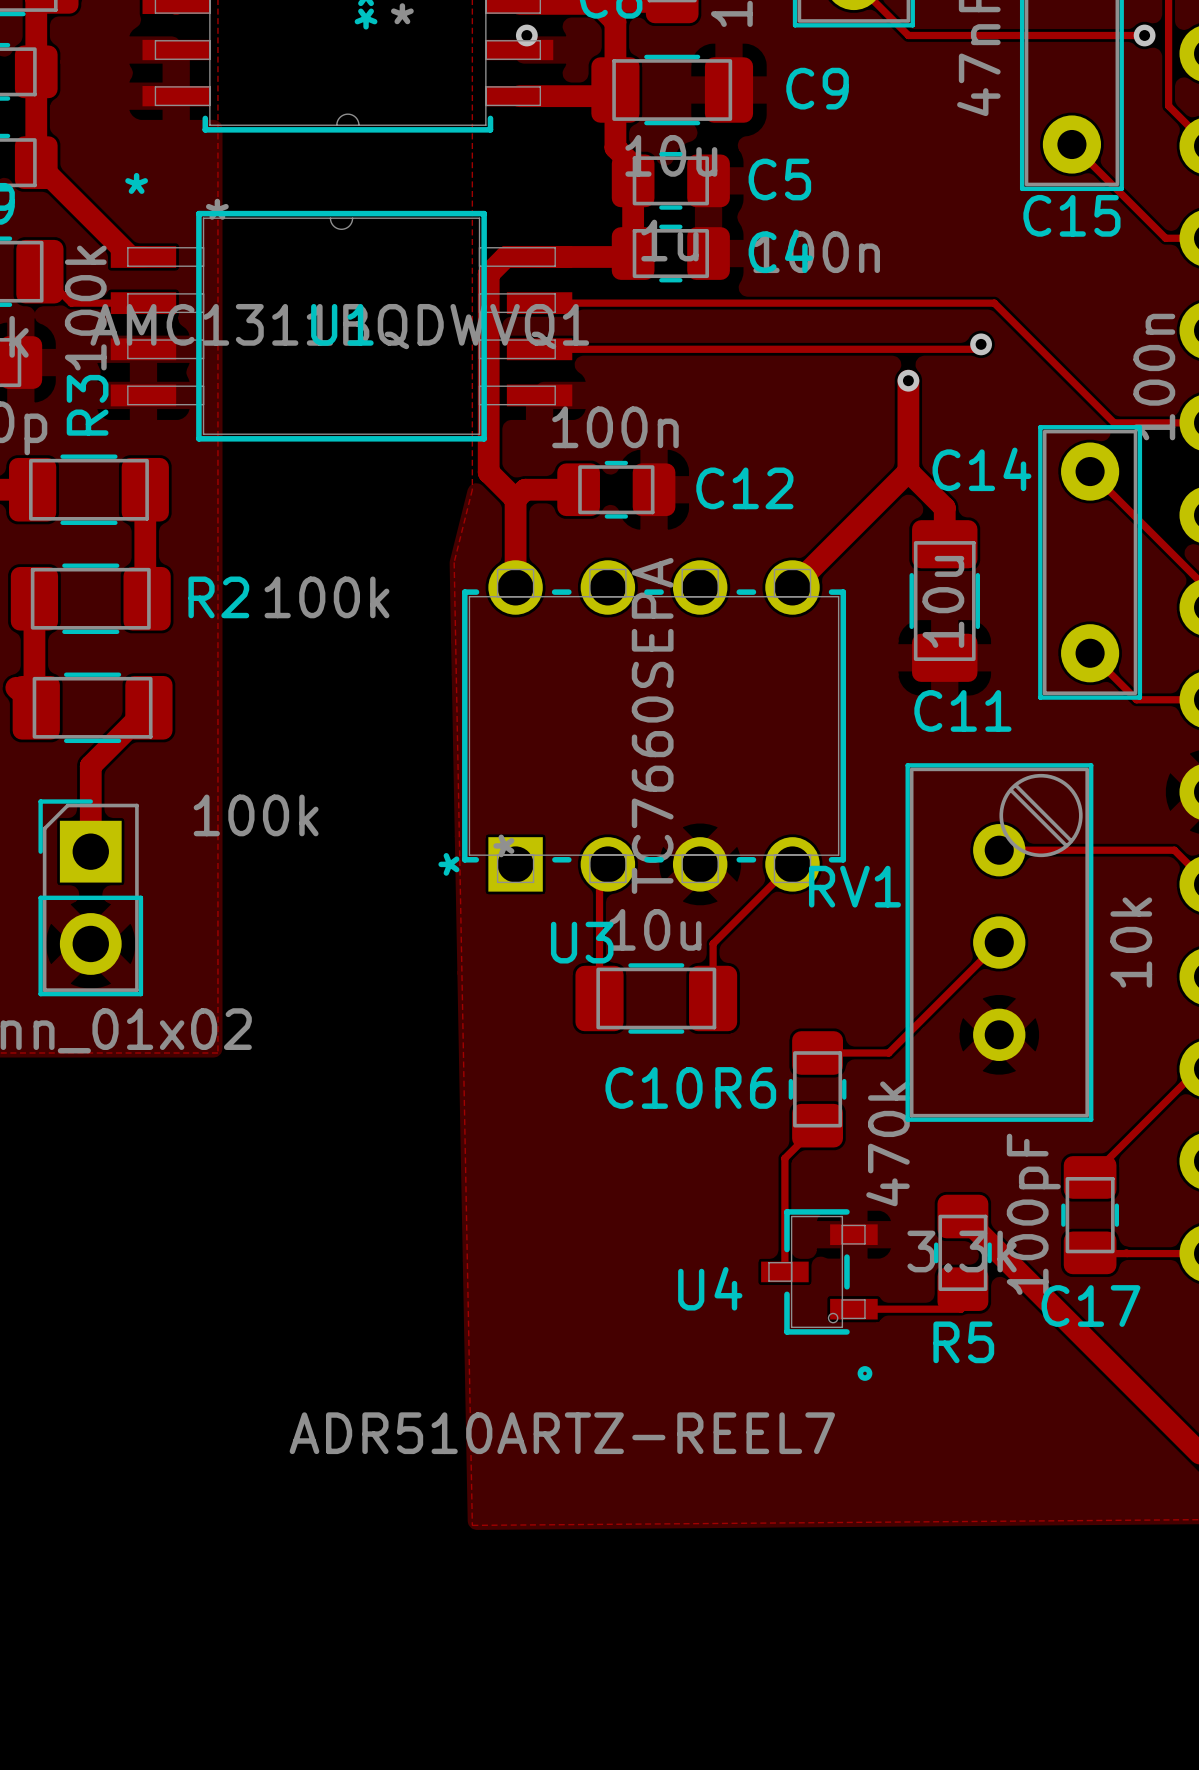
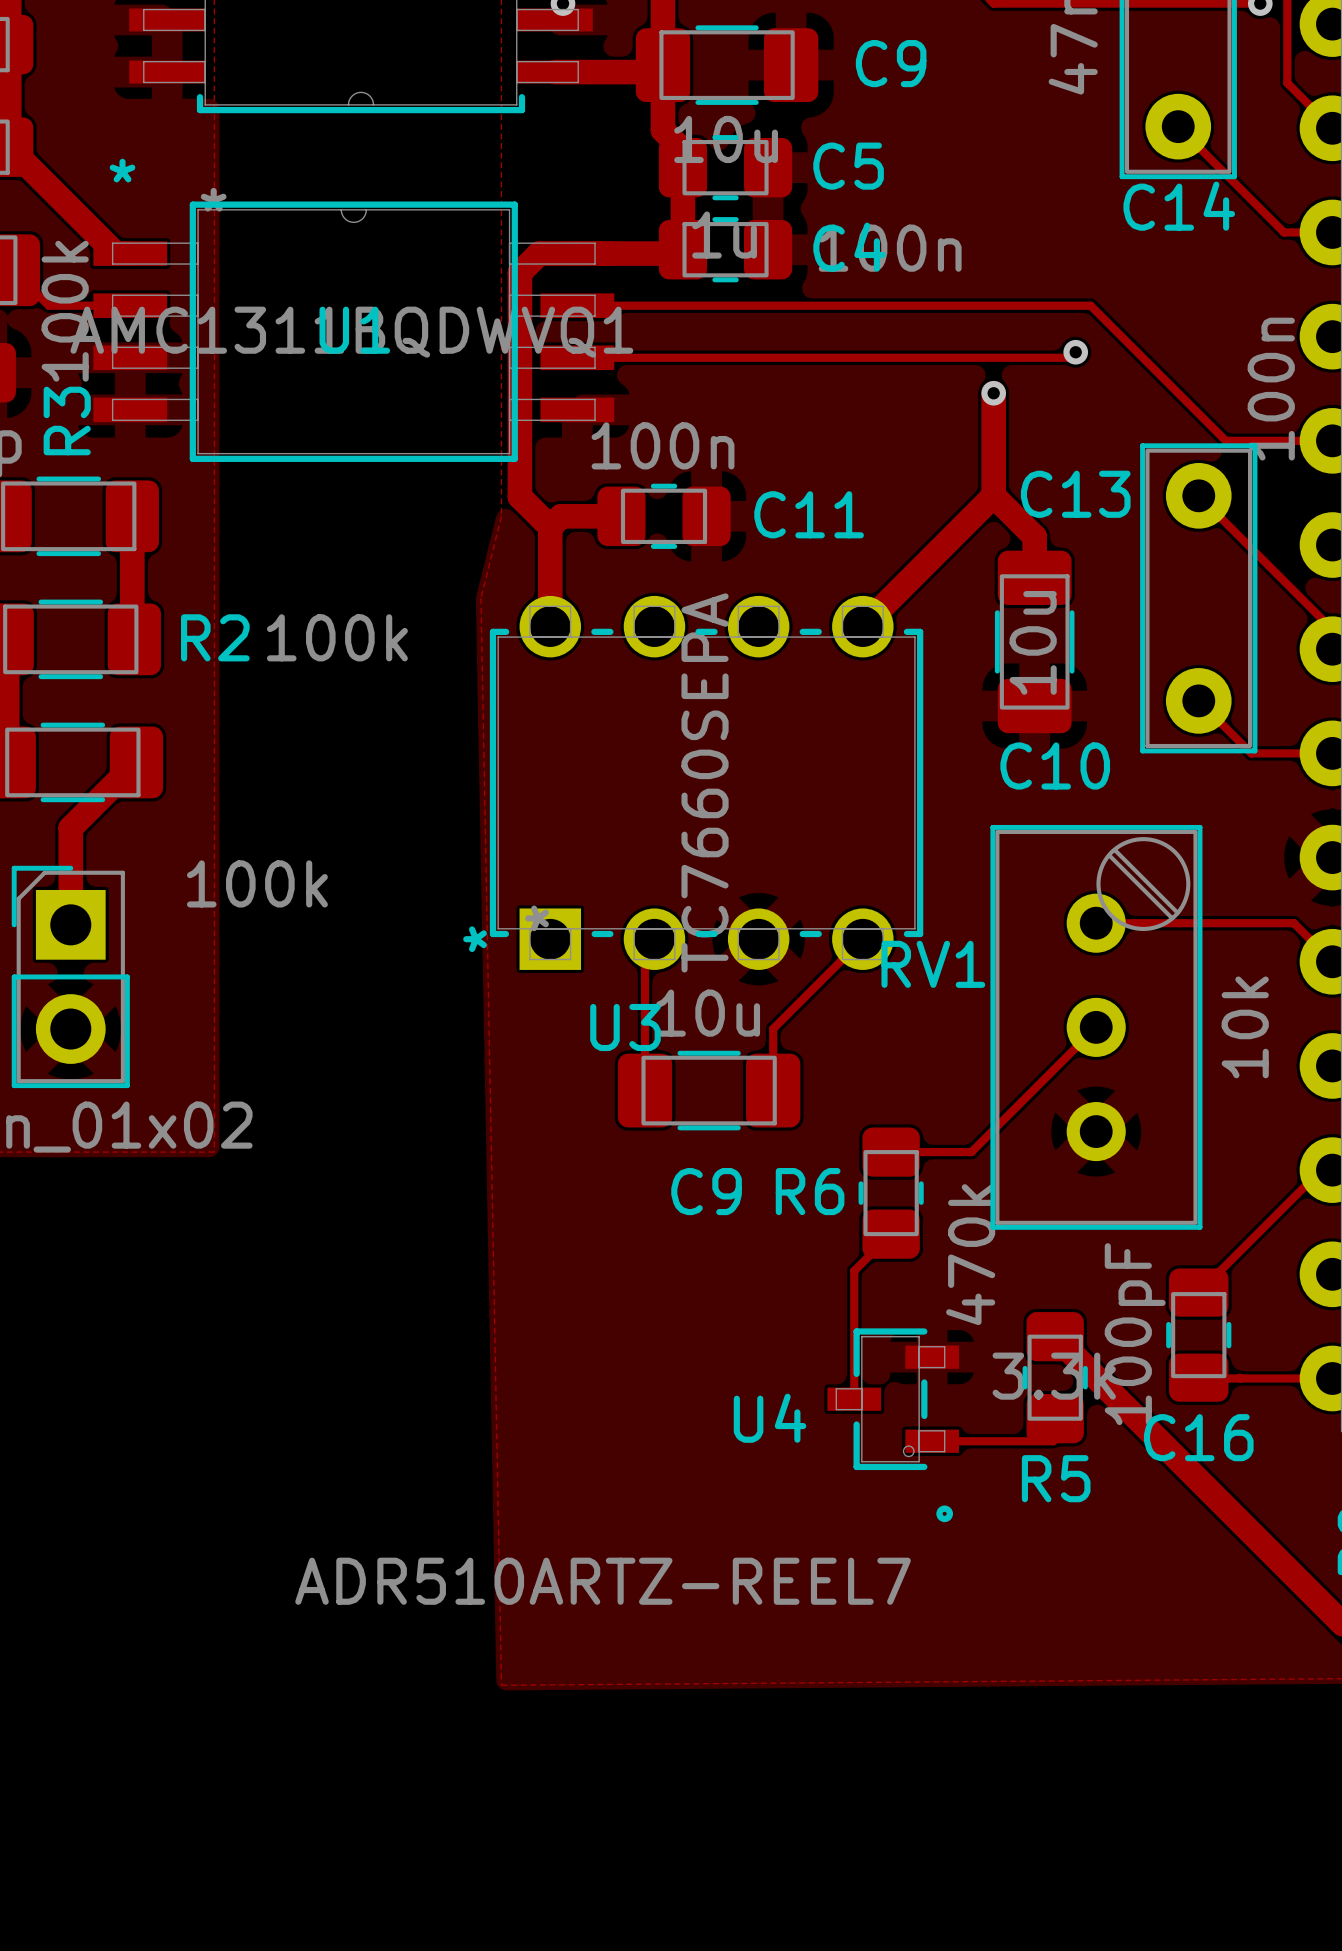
C15 name: C15 (1071, 215) -> C14 (1179, 206)
C14 name: C14 (981, 469) -> C13 (1075, 494)
C12 name: C12 (744, 488) -> C11 (809, 514)
C11 name: C11 (962, 710) -> C10 (1055, 766)
C10 name: C10 (654, 1087) -> C9 (706, 1191)
C17 name: C17 (1090, 1306) -> C16 (1198, 1437)

